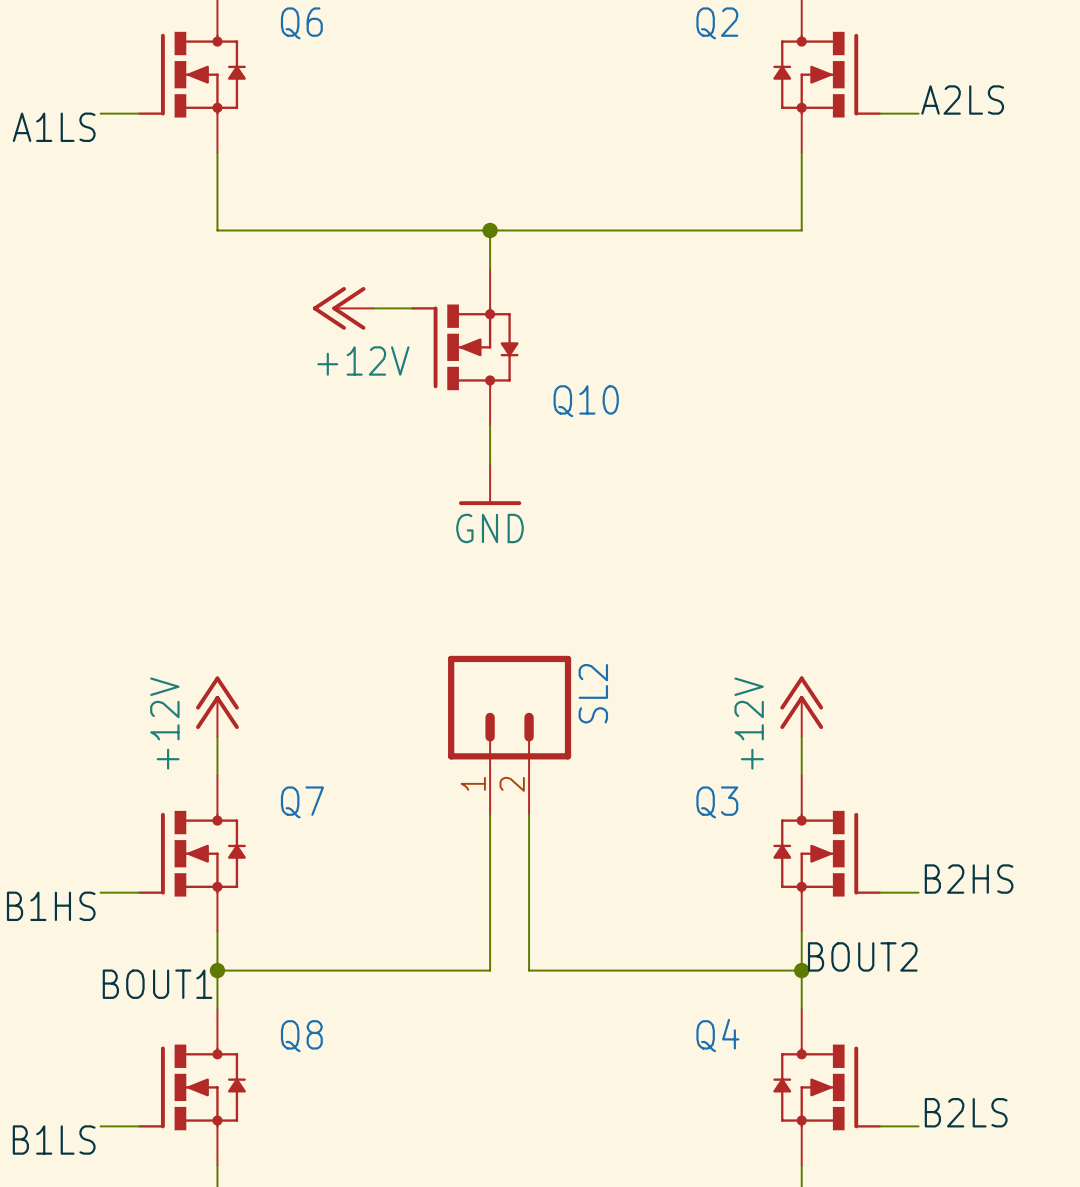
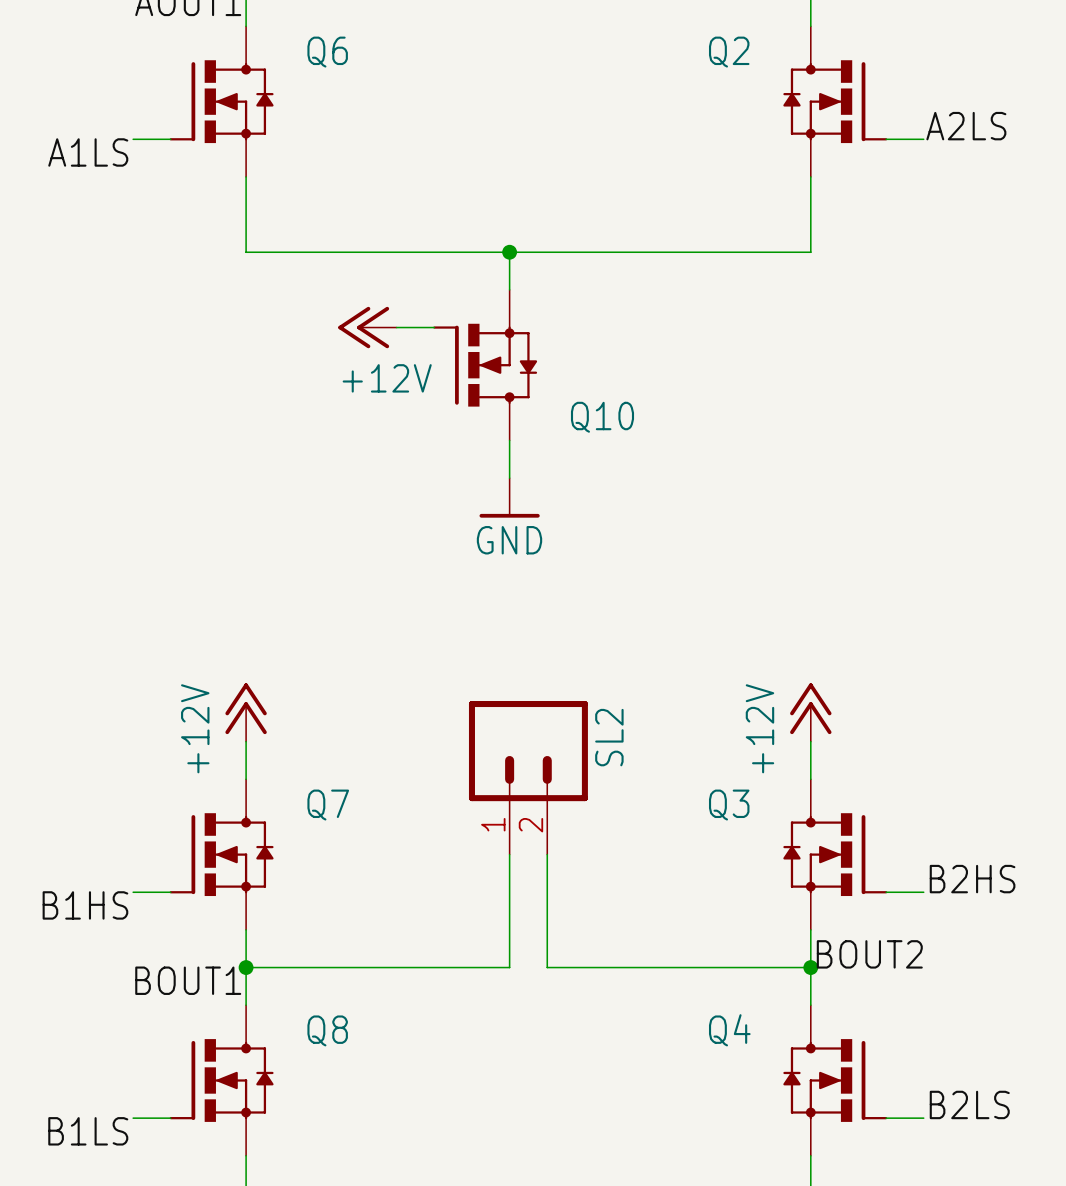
SL2 position: (509, 735) -> (528, 777)

